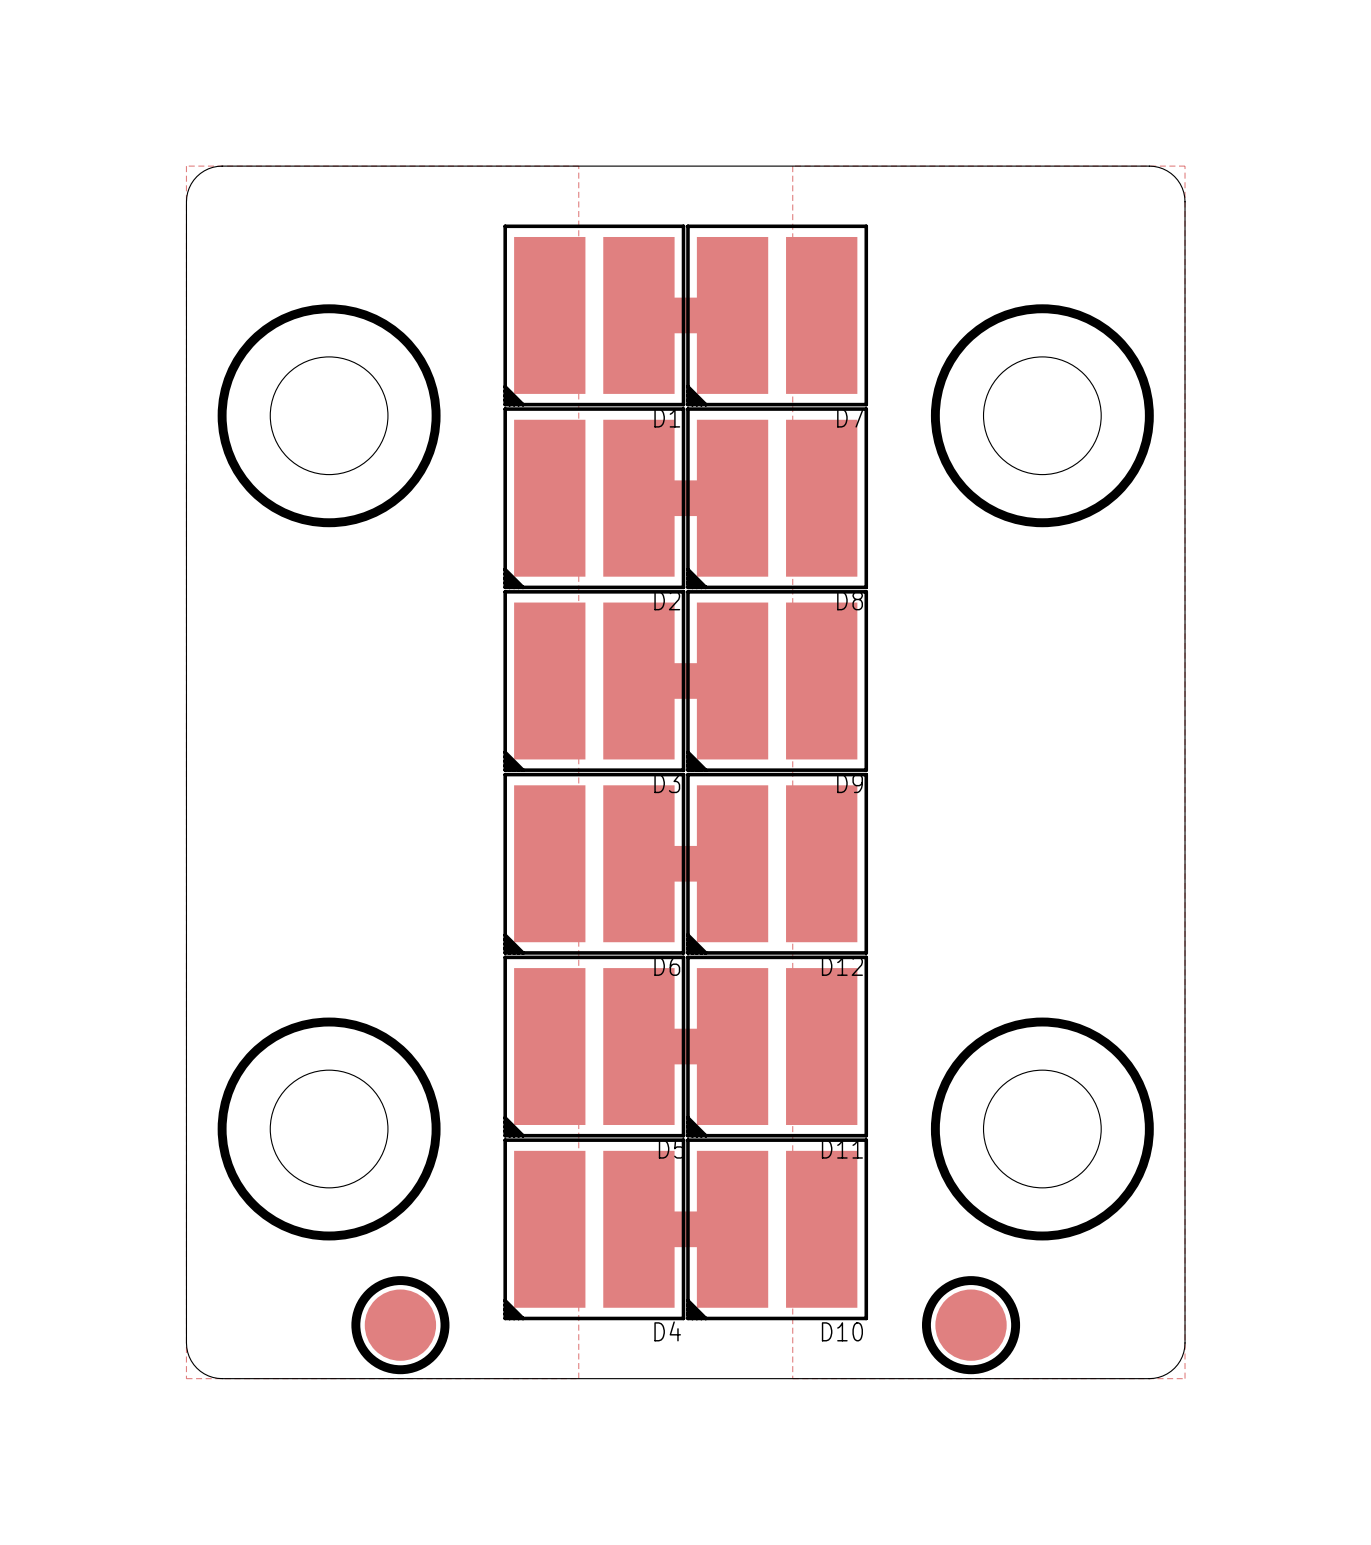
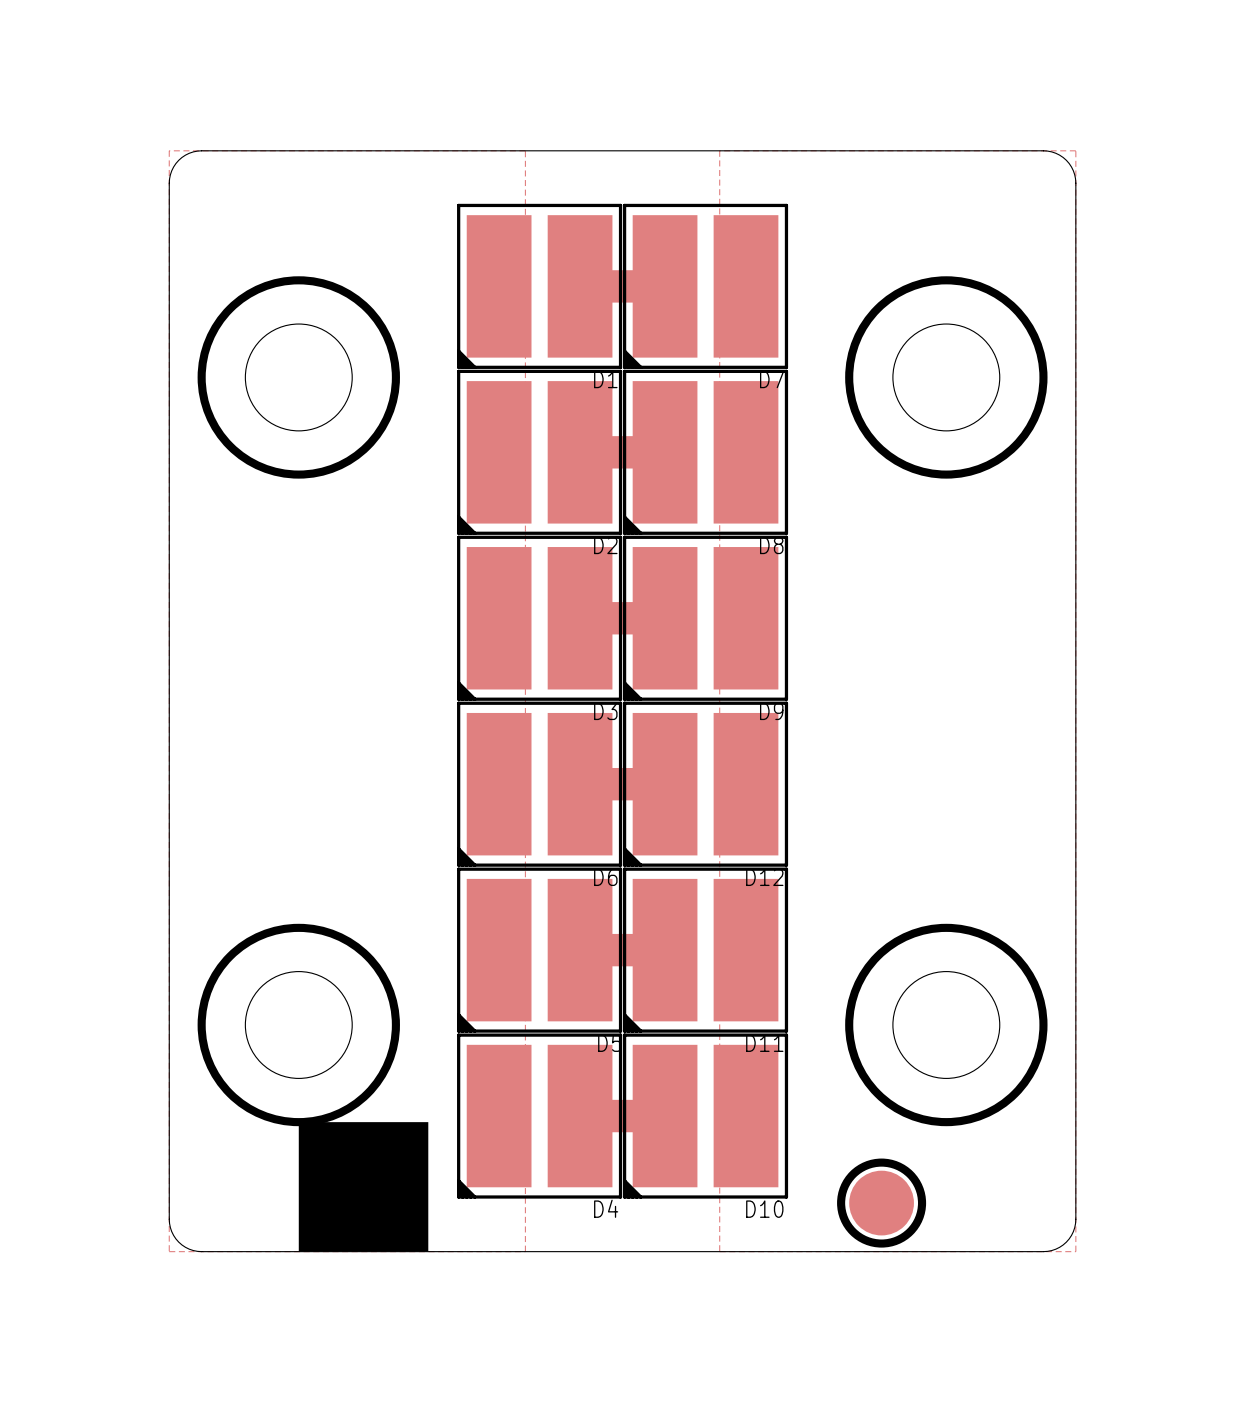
drawing: none -> [298, 1122, 429, 1252]

